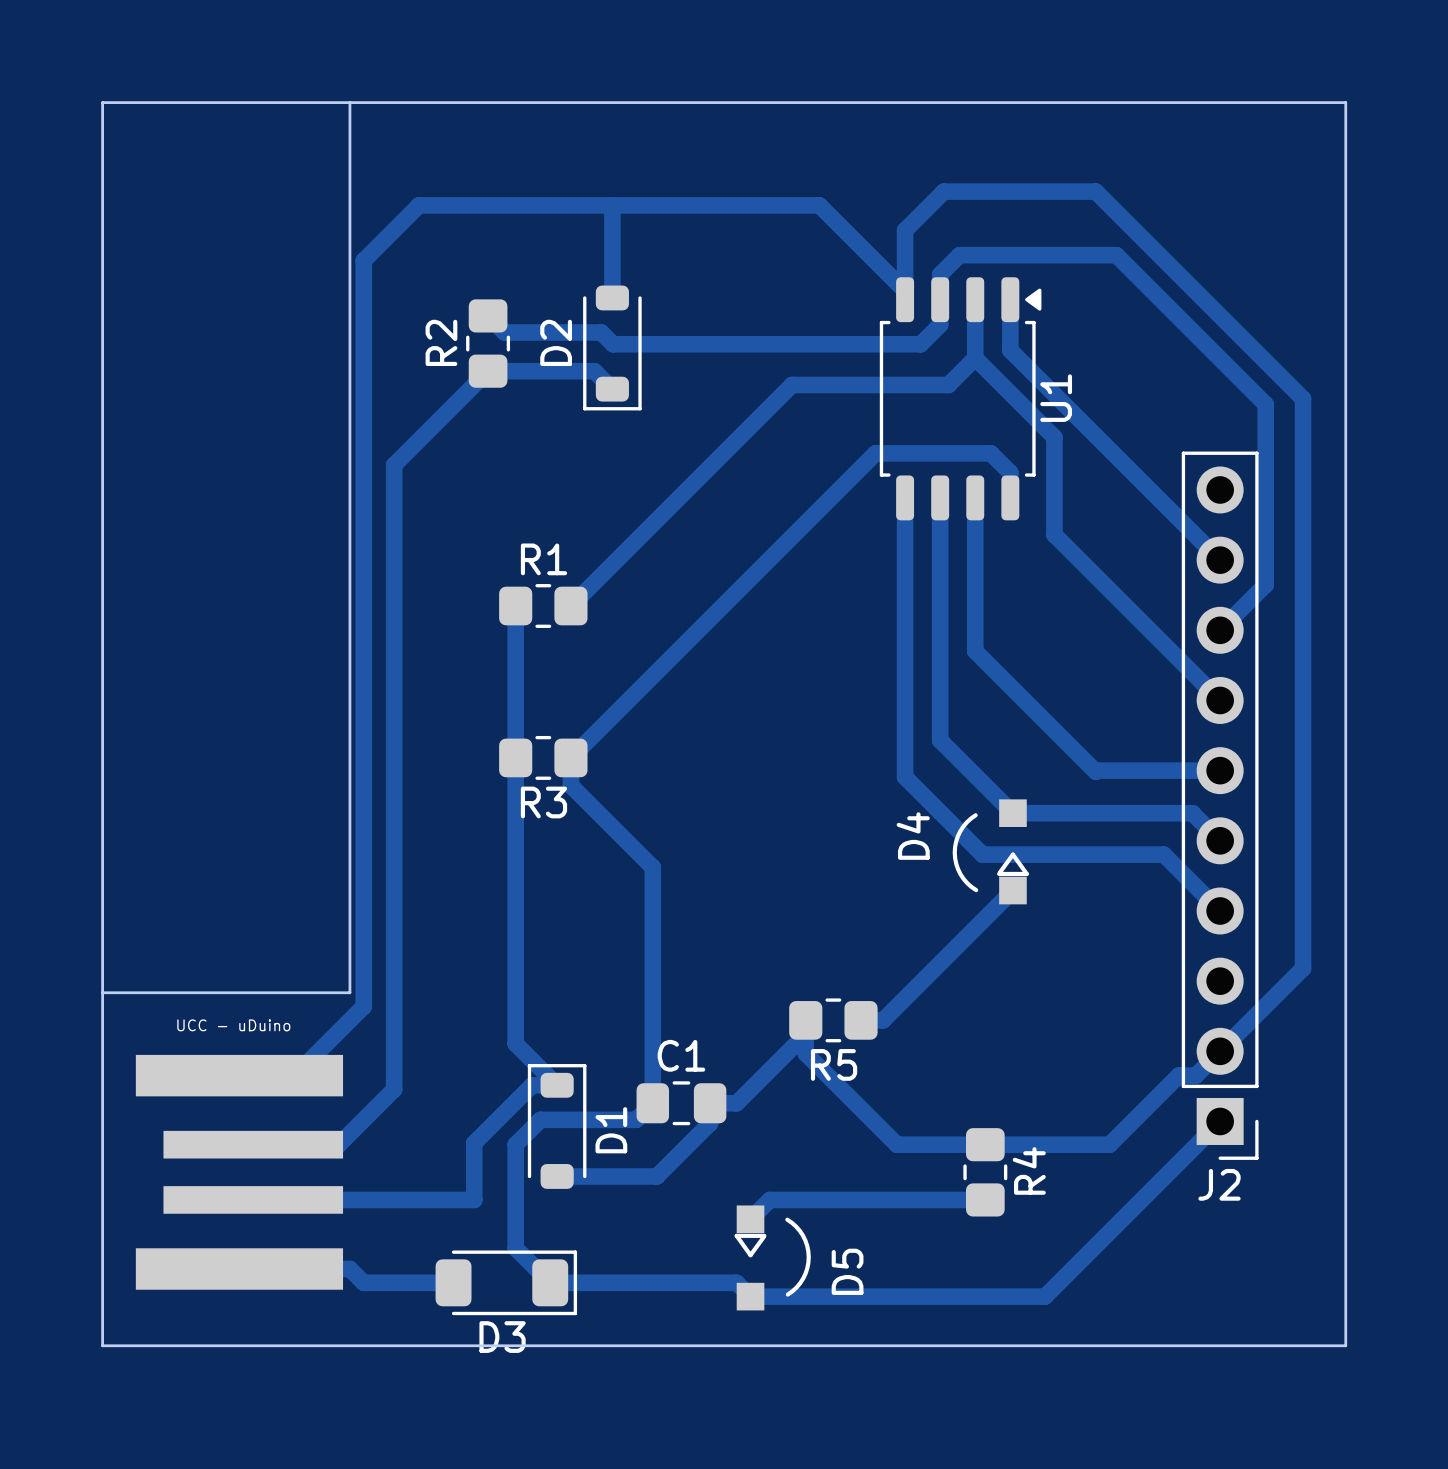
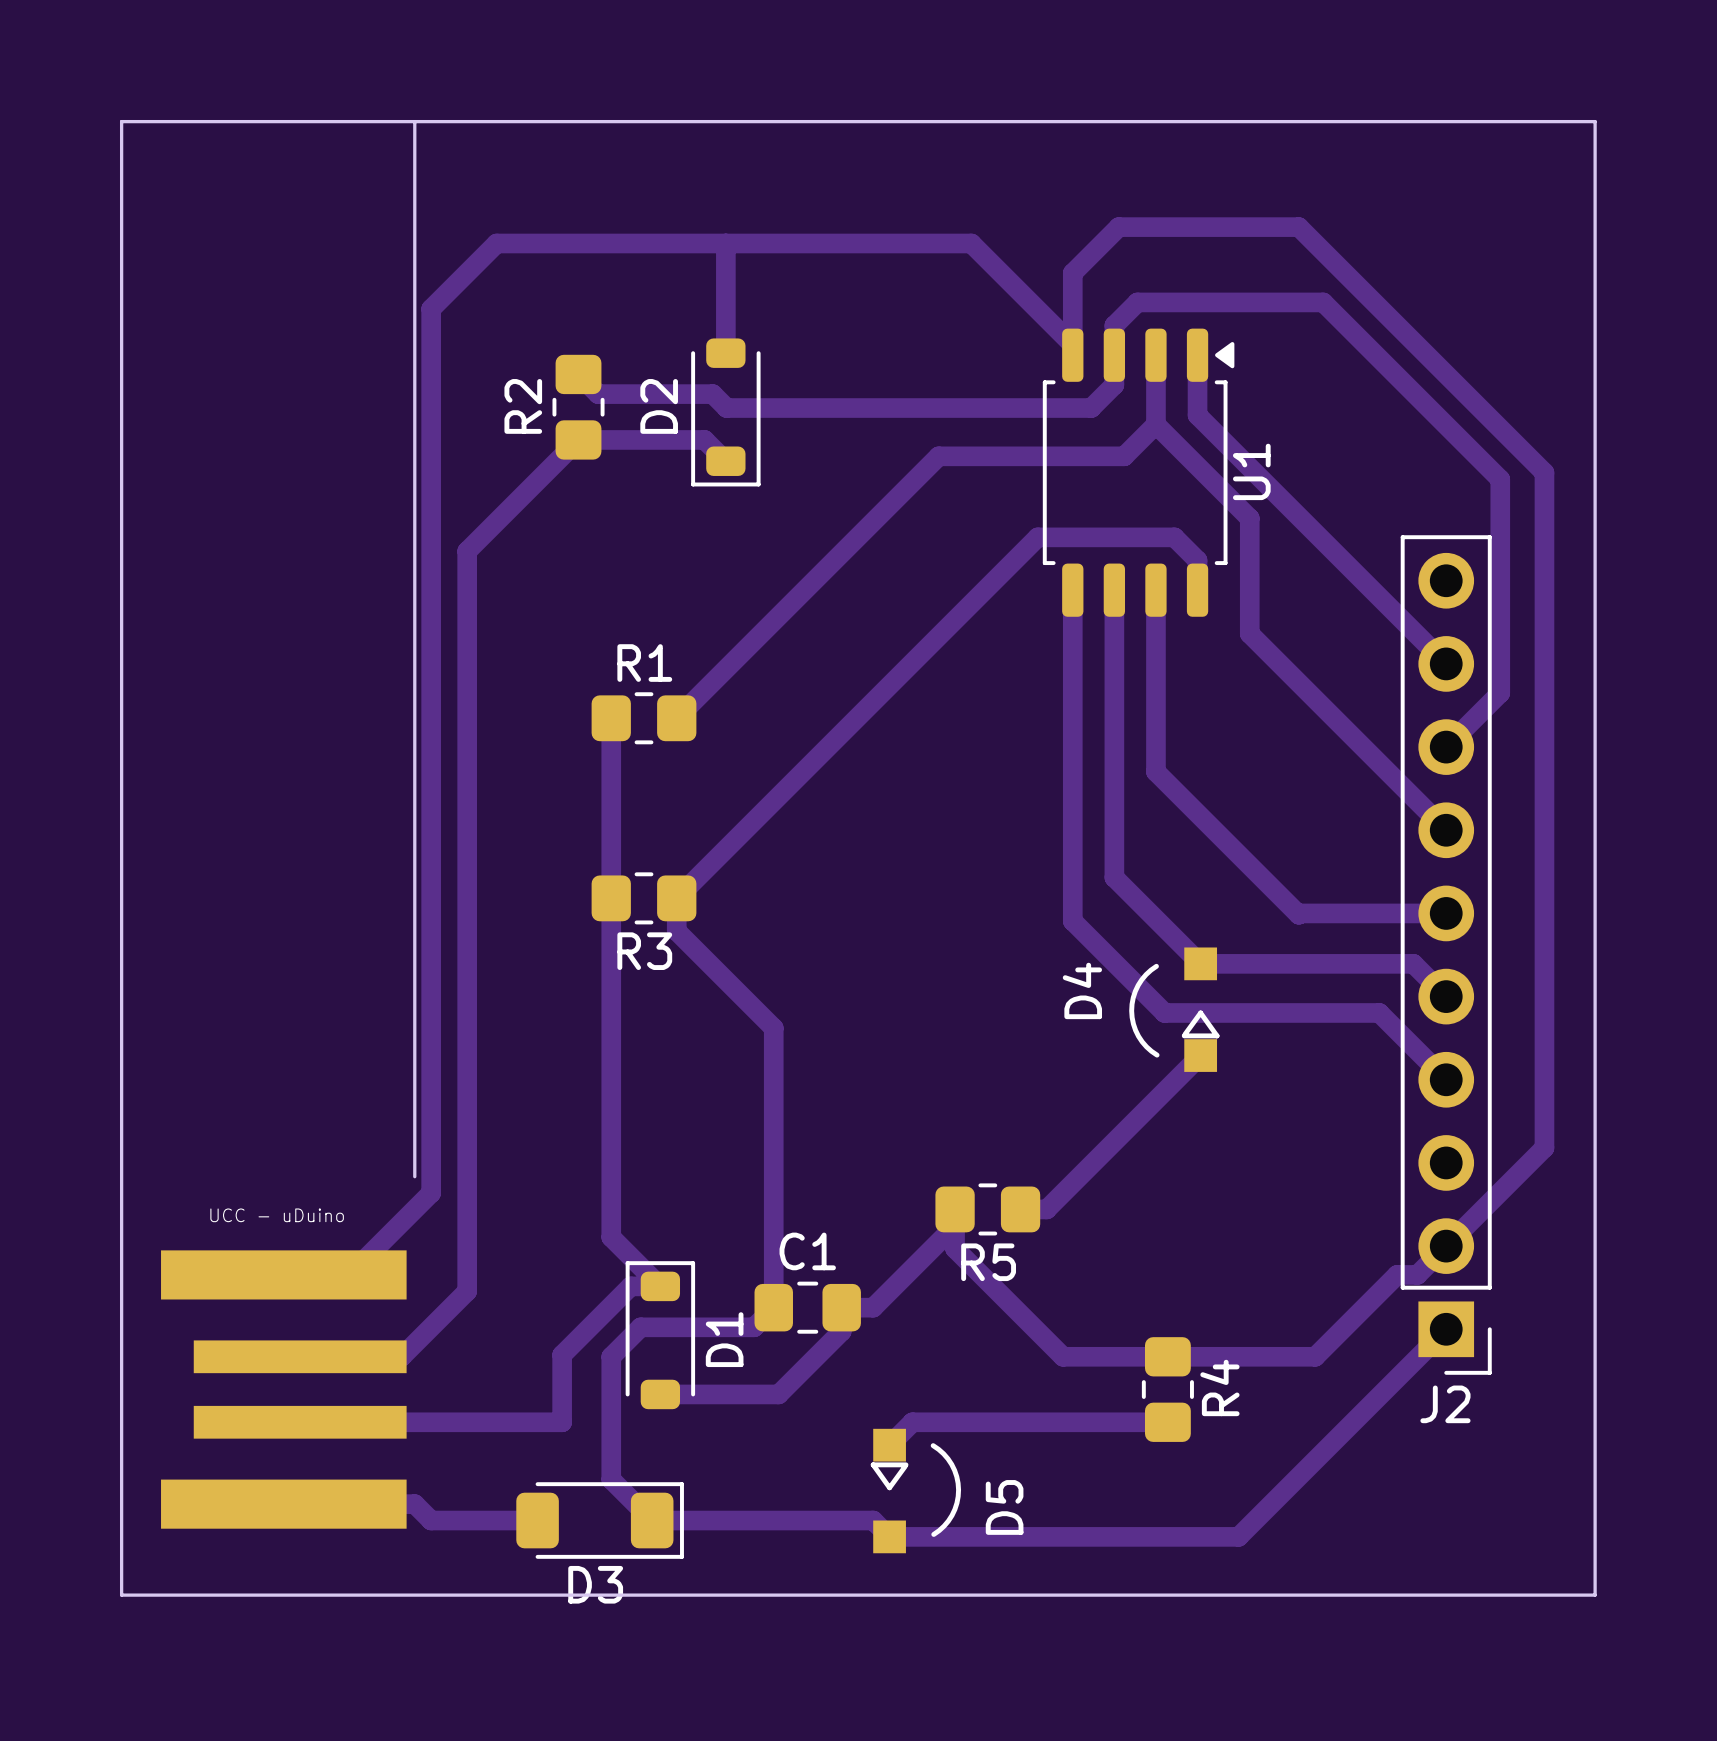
board edge: (102, 992) (349, 992) -> none

